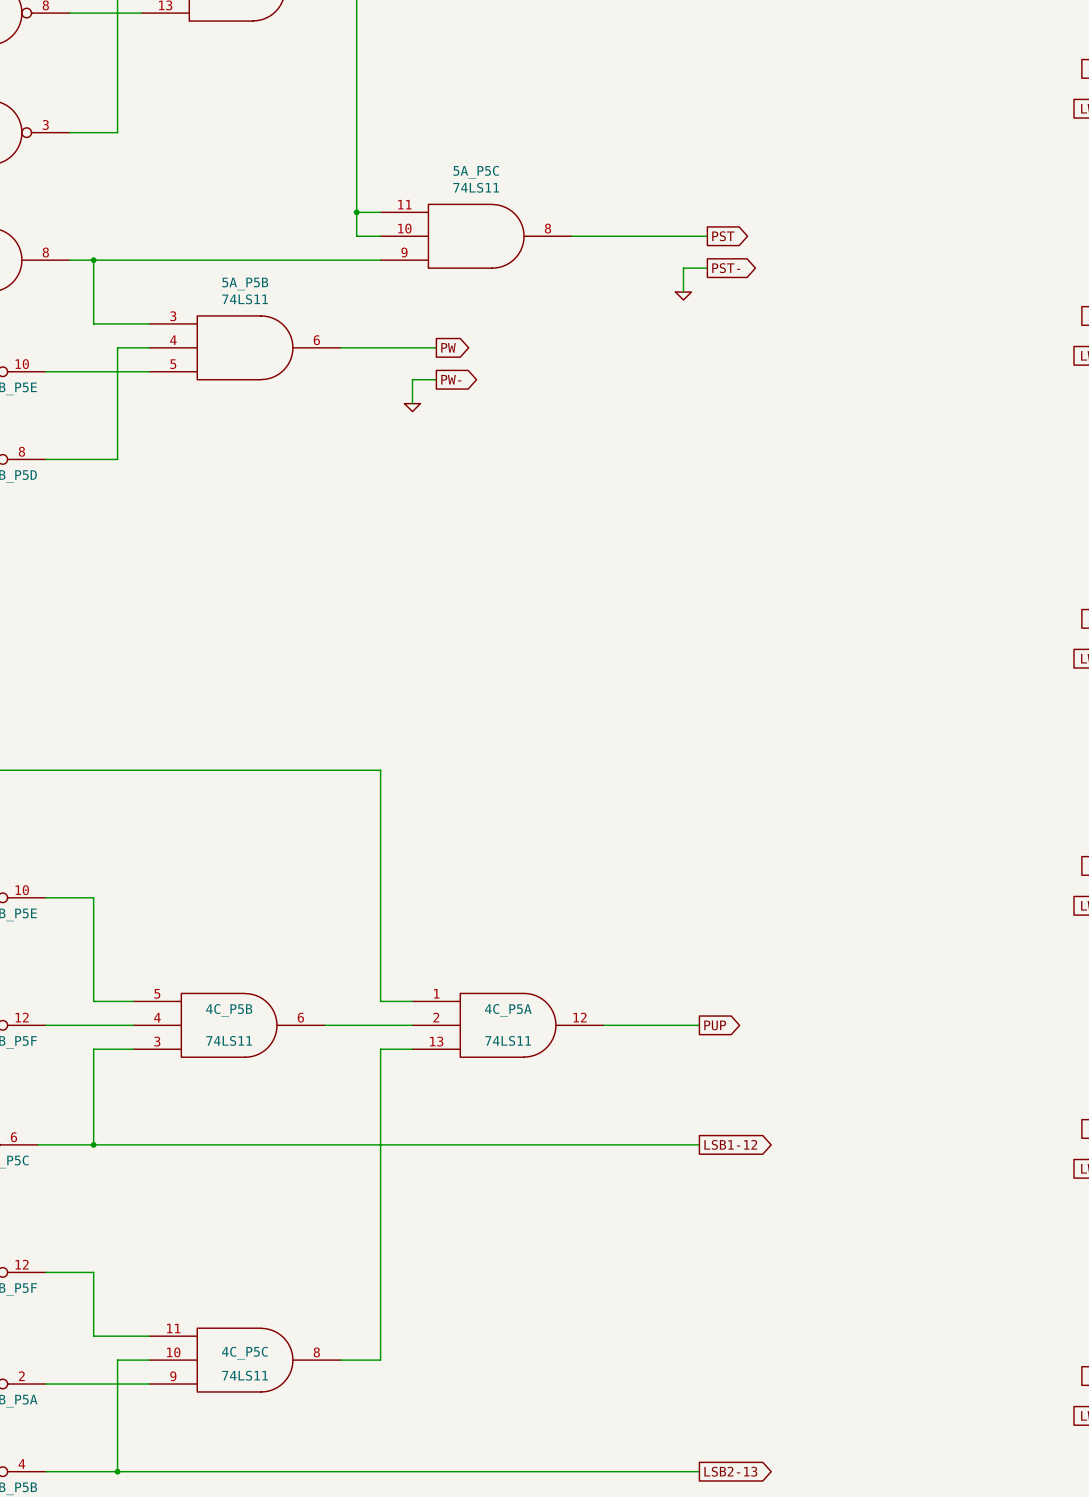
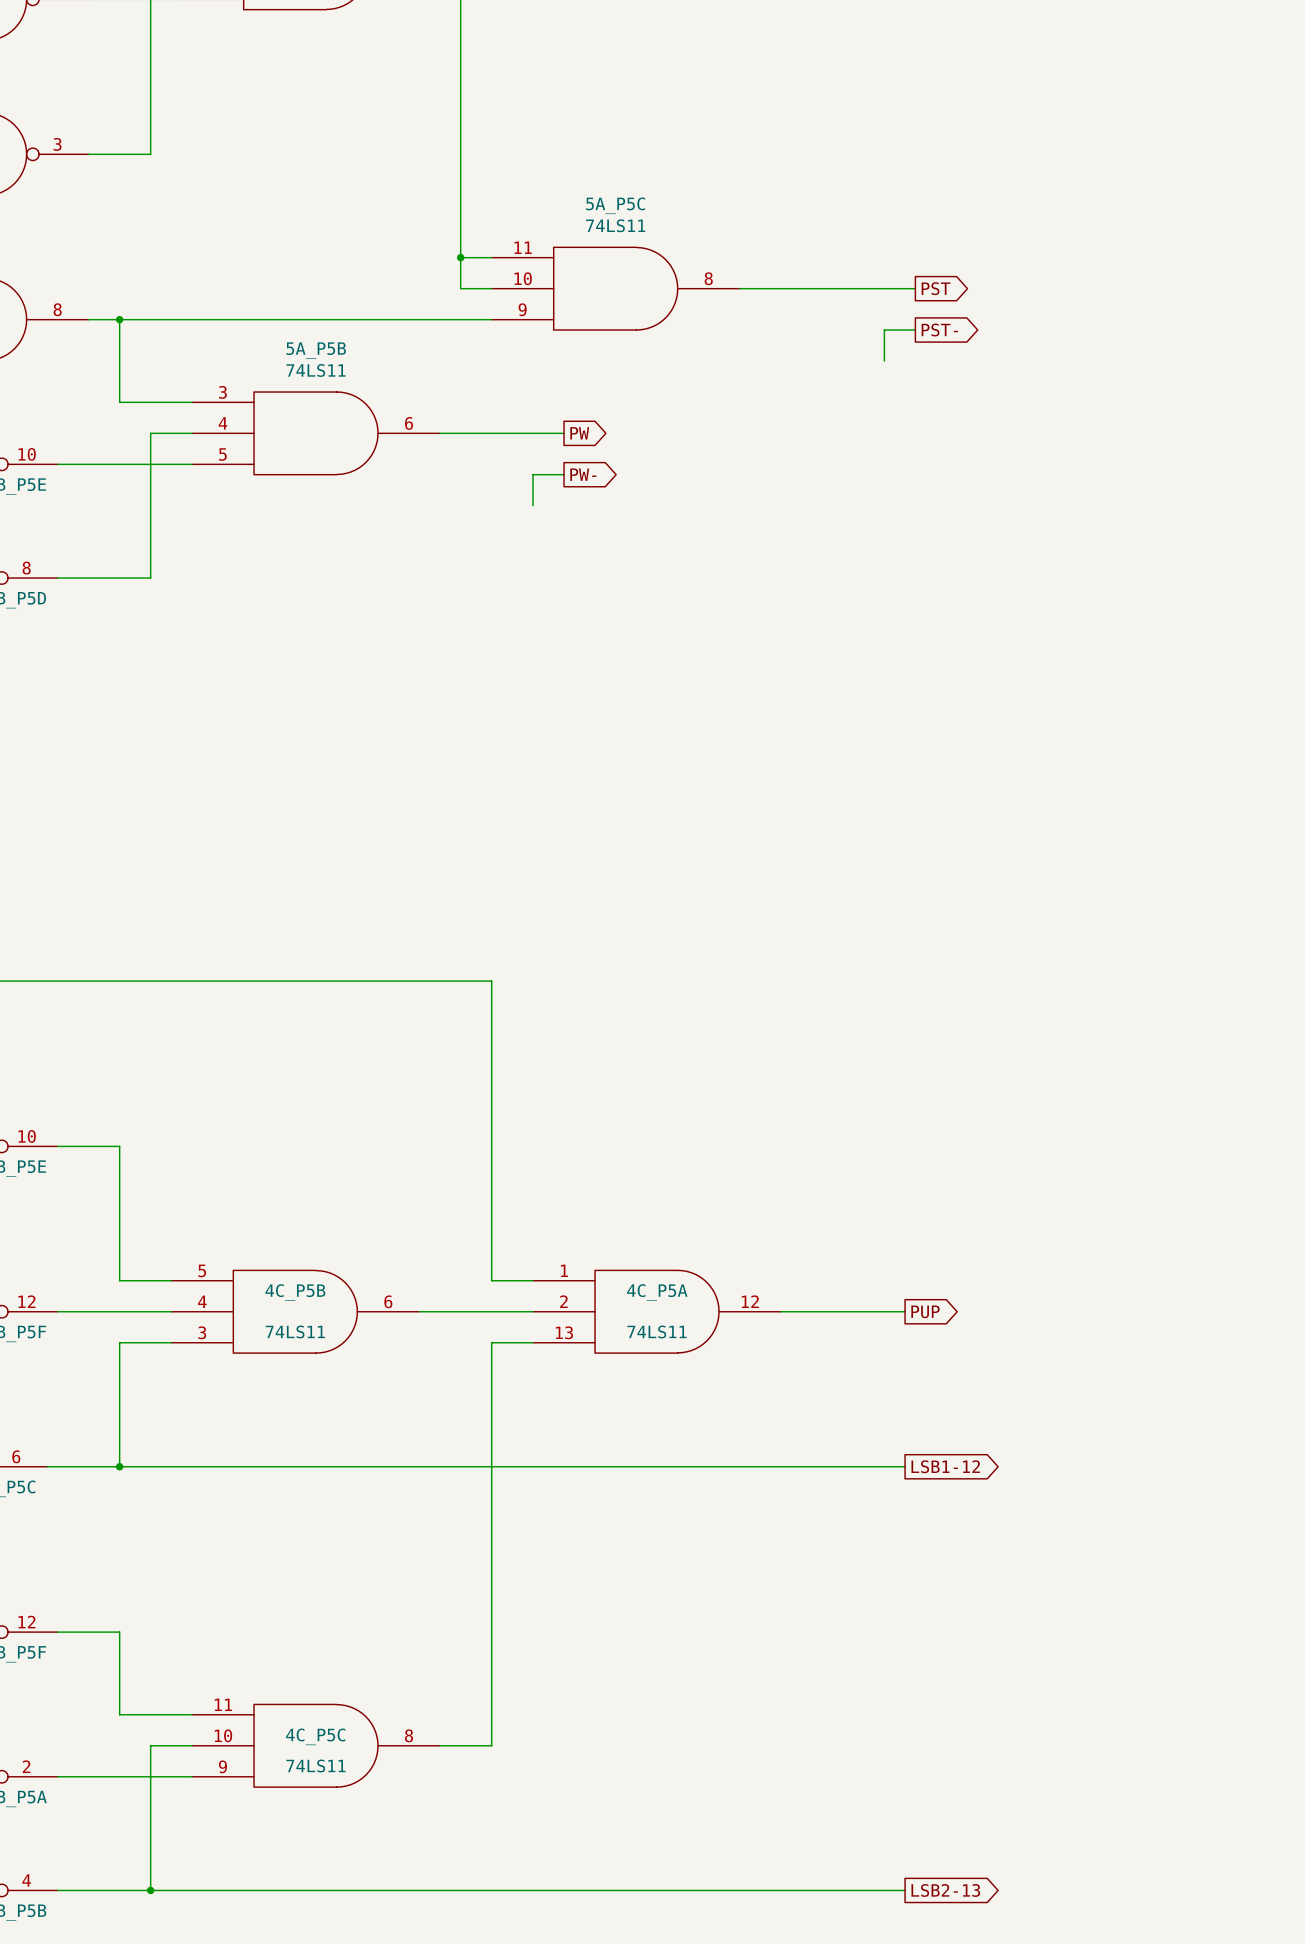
power symbol: (683, 296) -> none
power symbol: (412, 407) -> none

